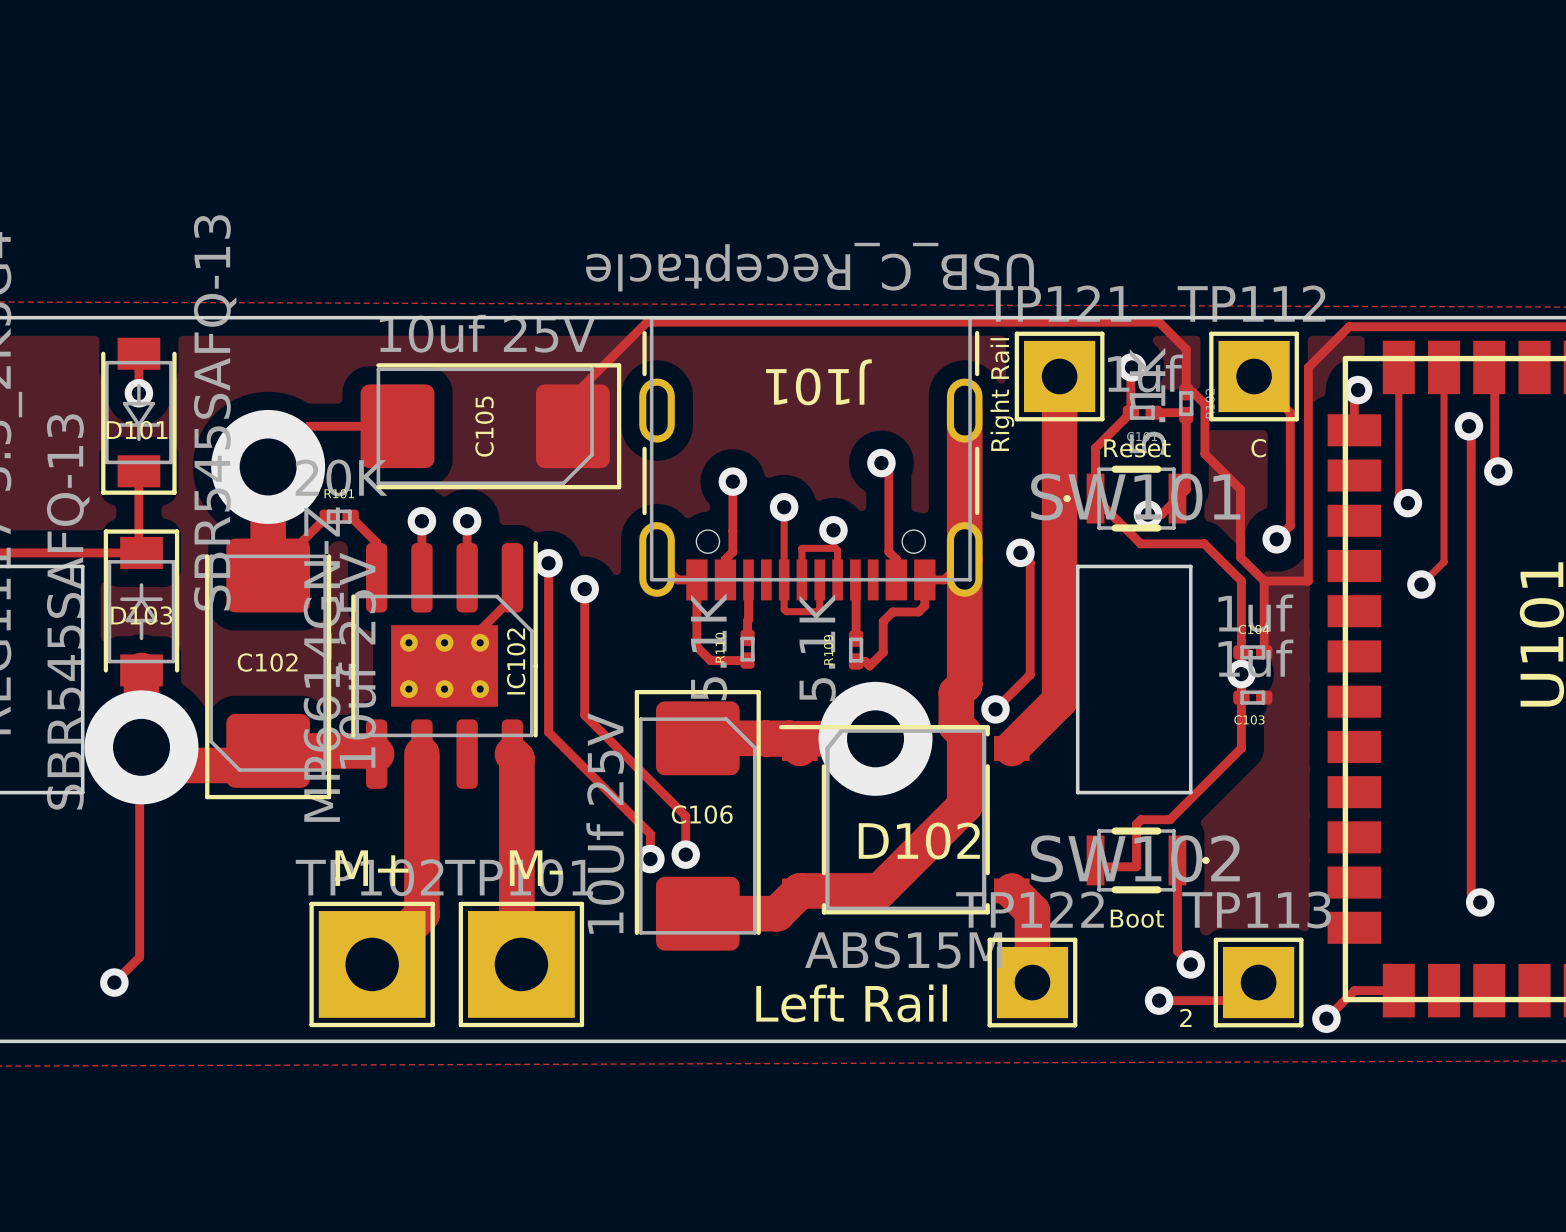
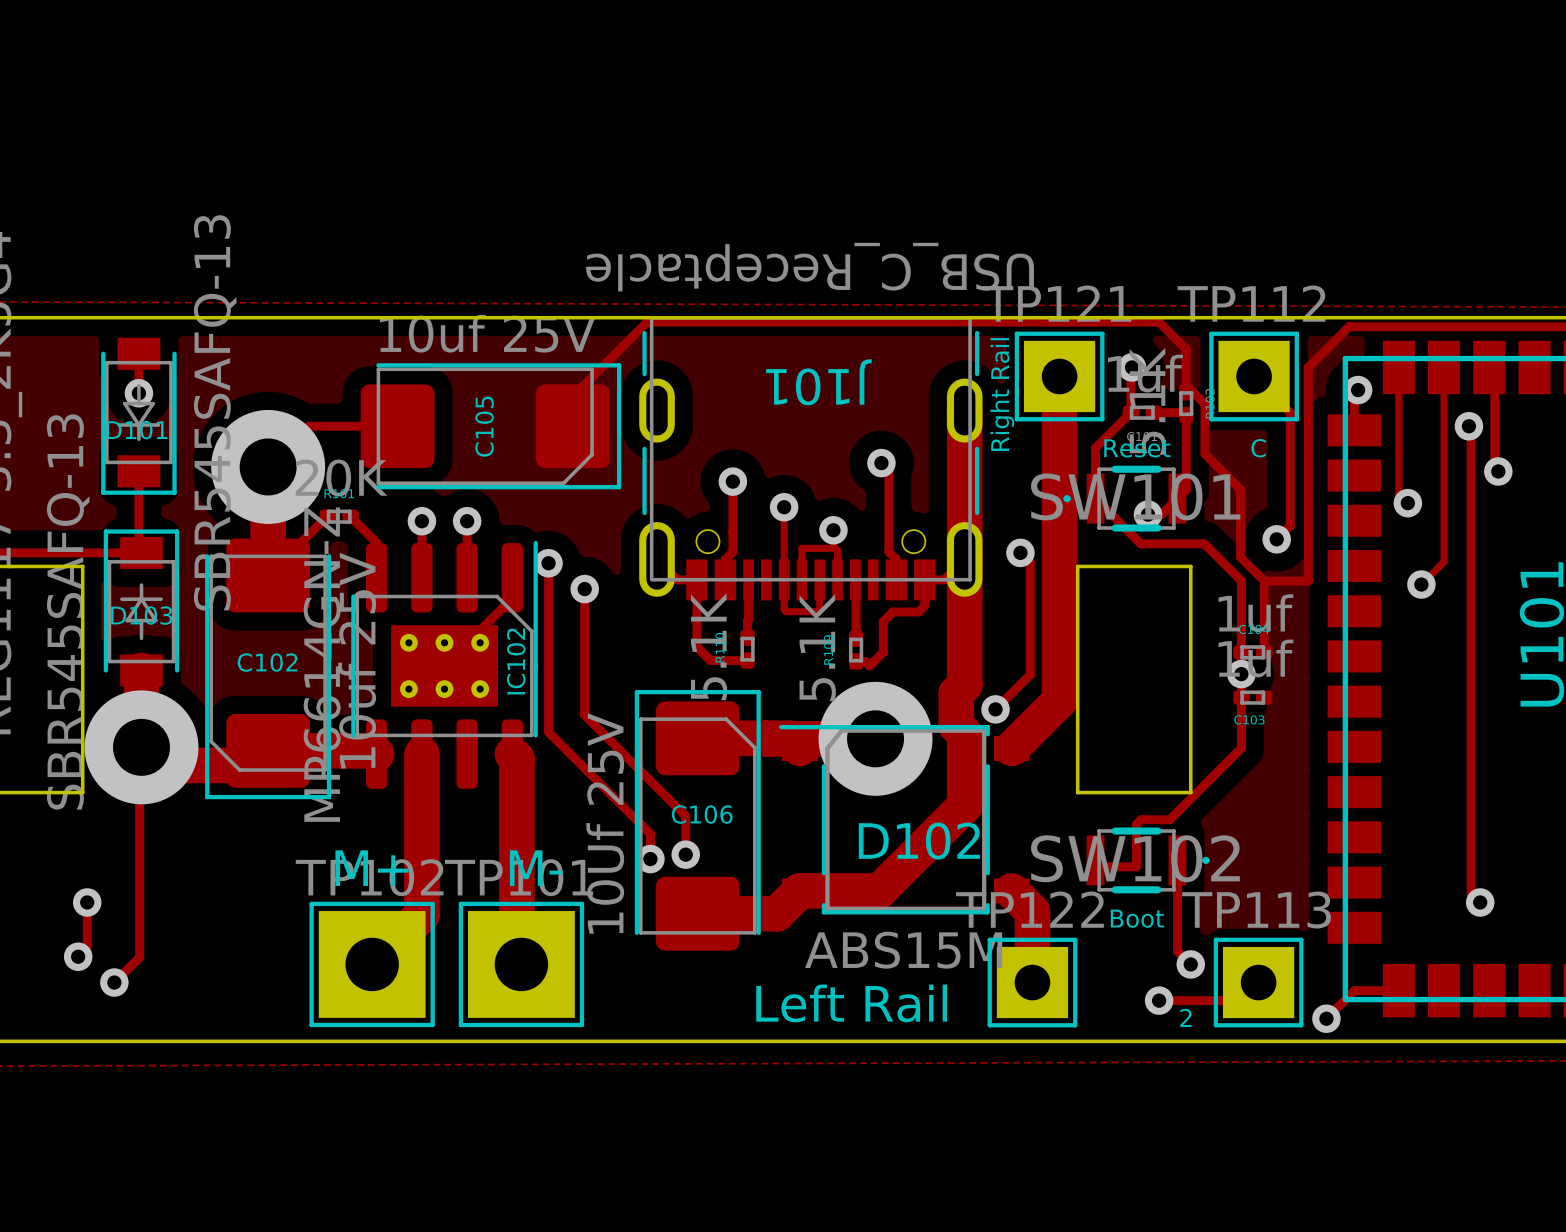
track: none -> (87, 902) (87, 947) (78, 956)
via: none -> (87, 902)
via: none -> (78, 956)

